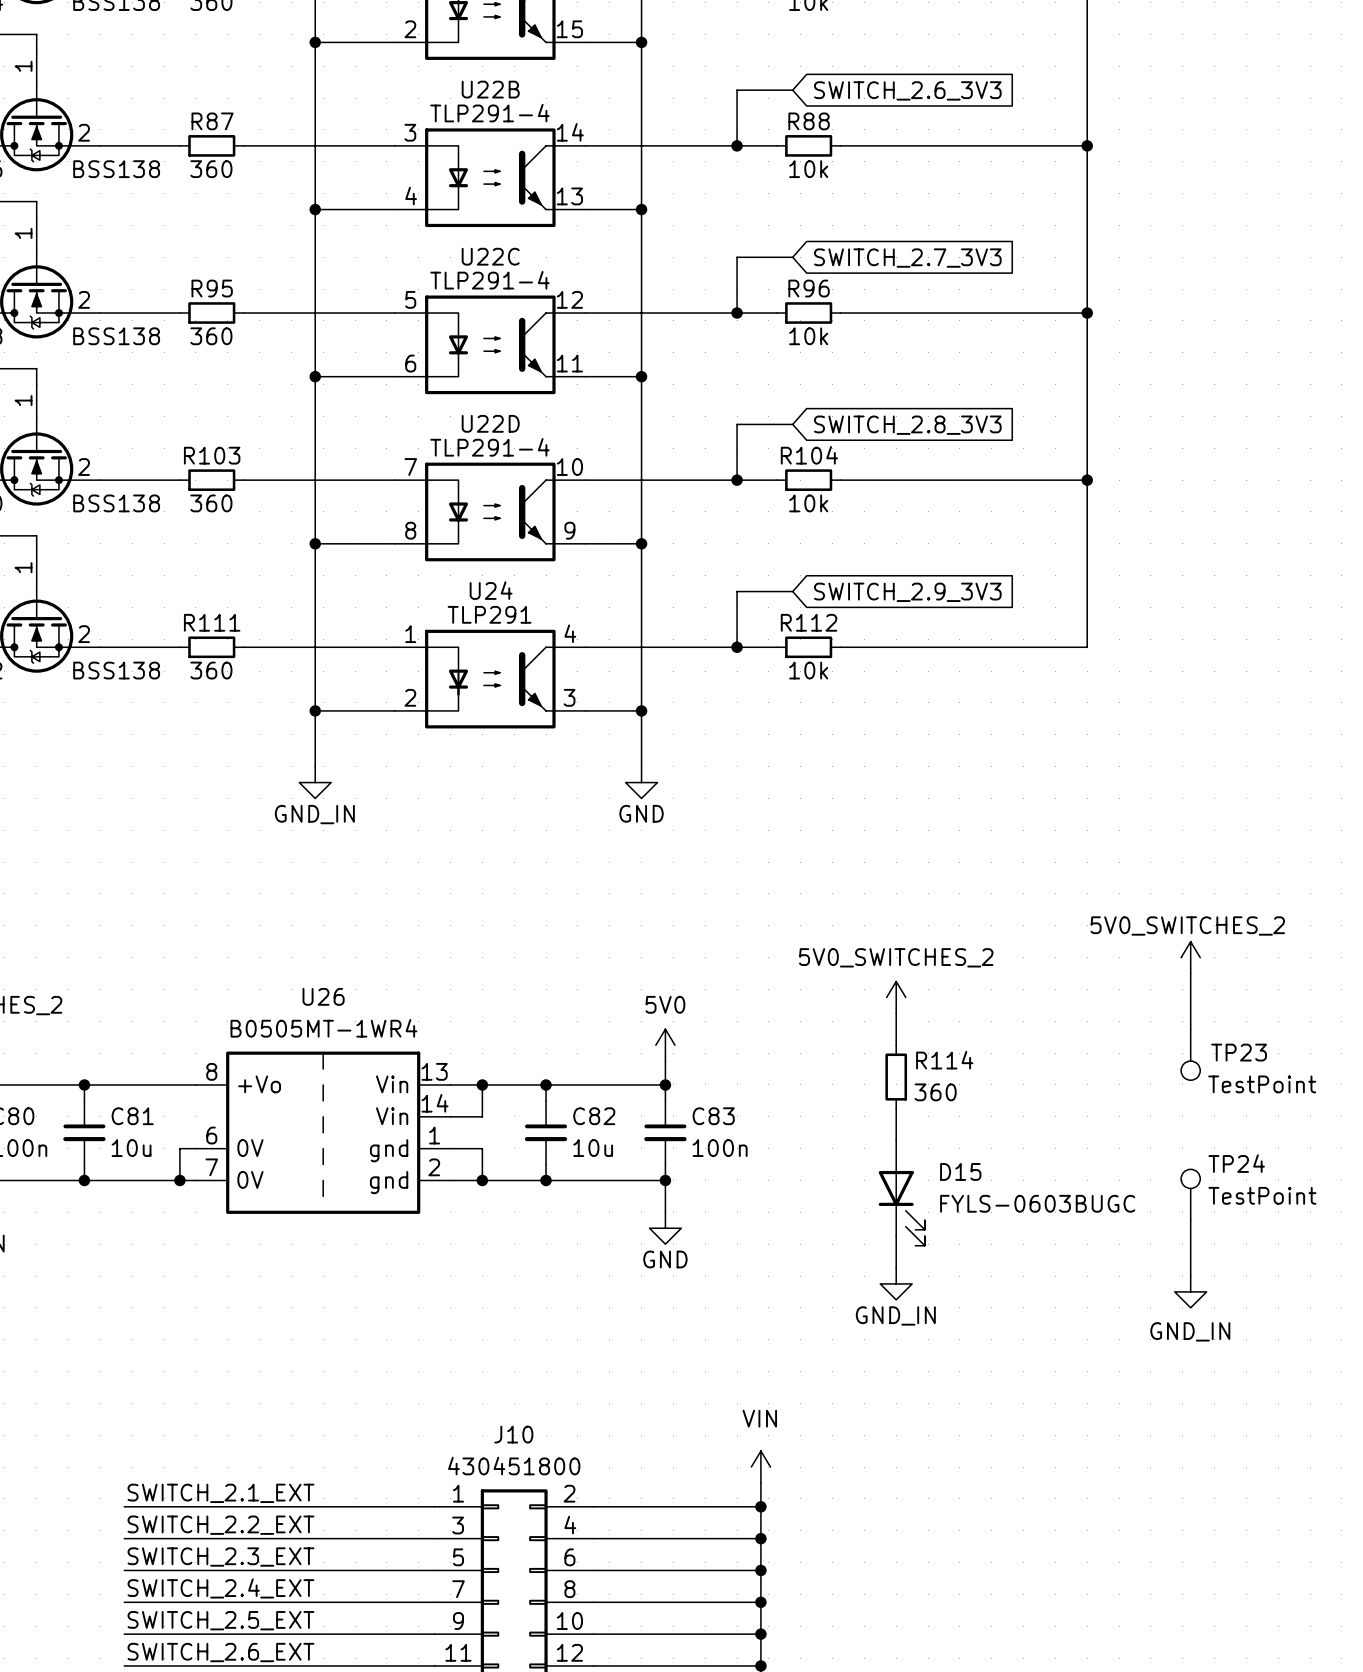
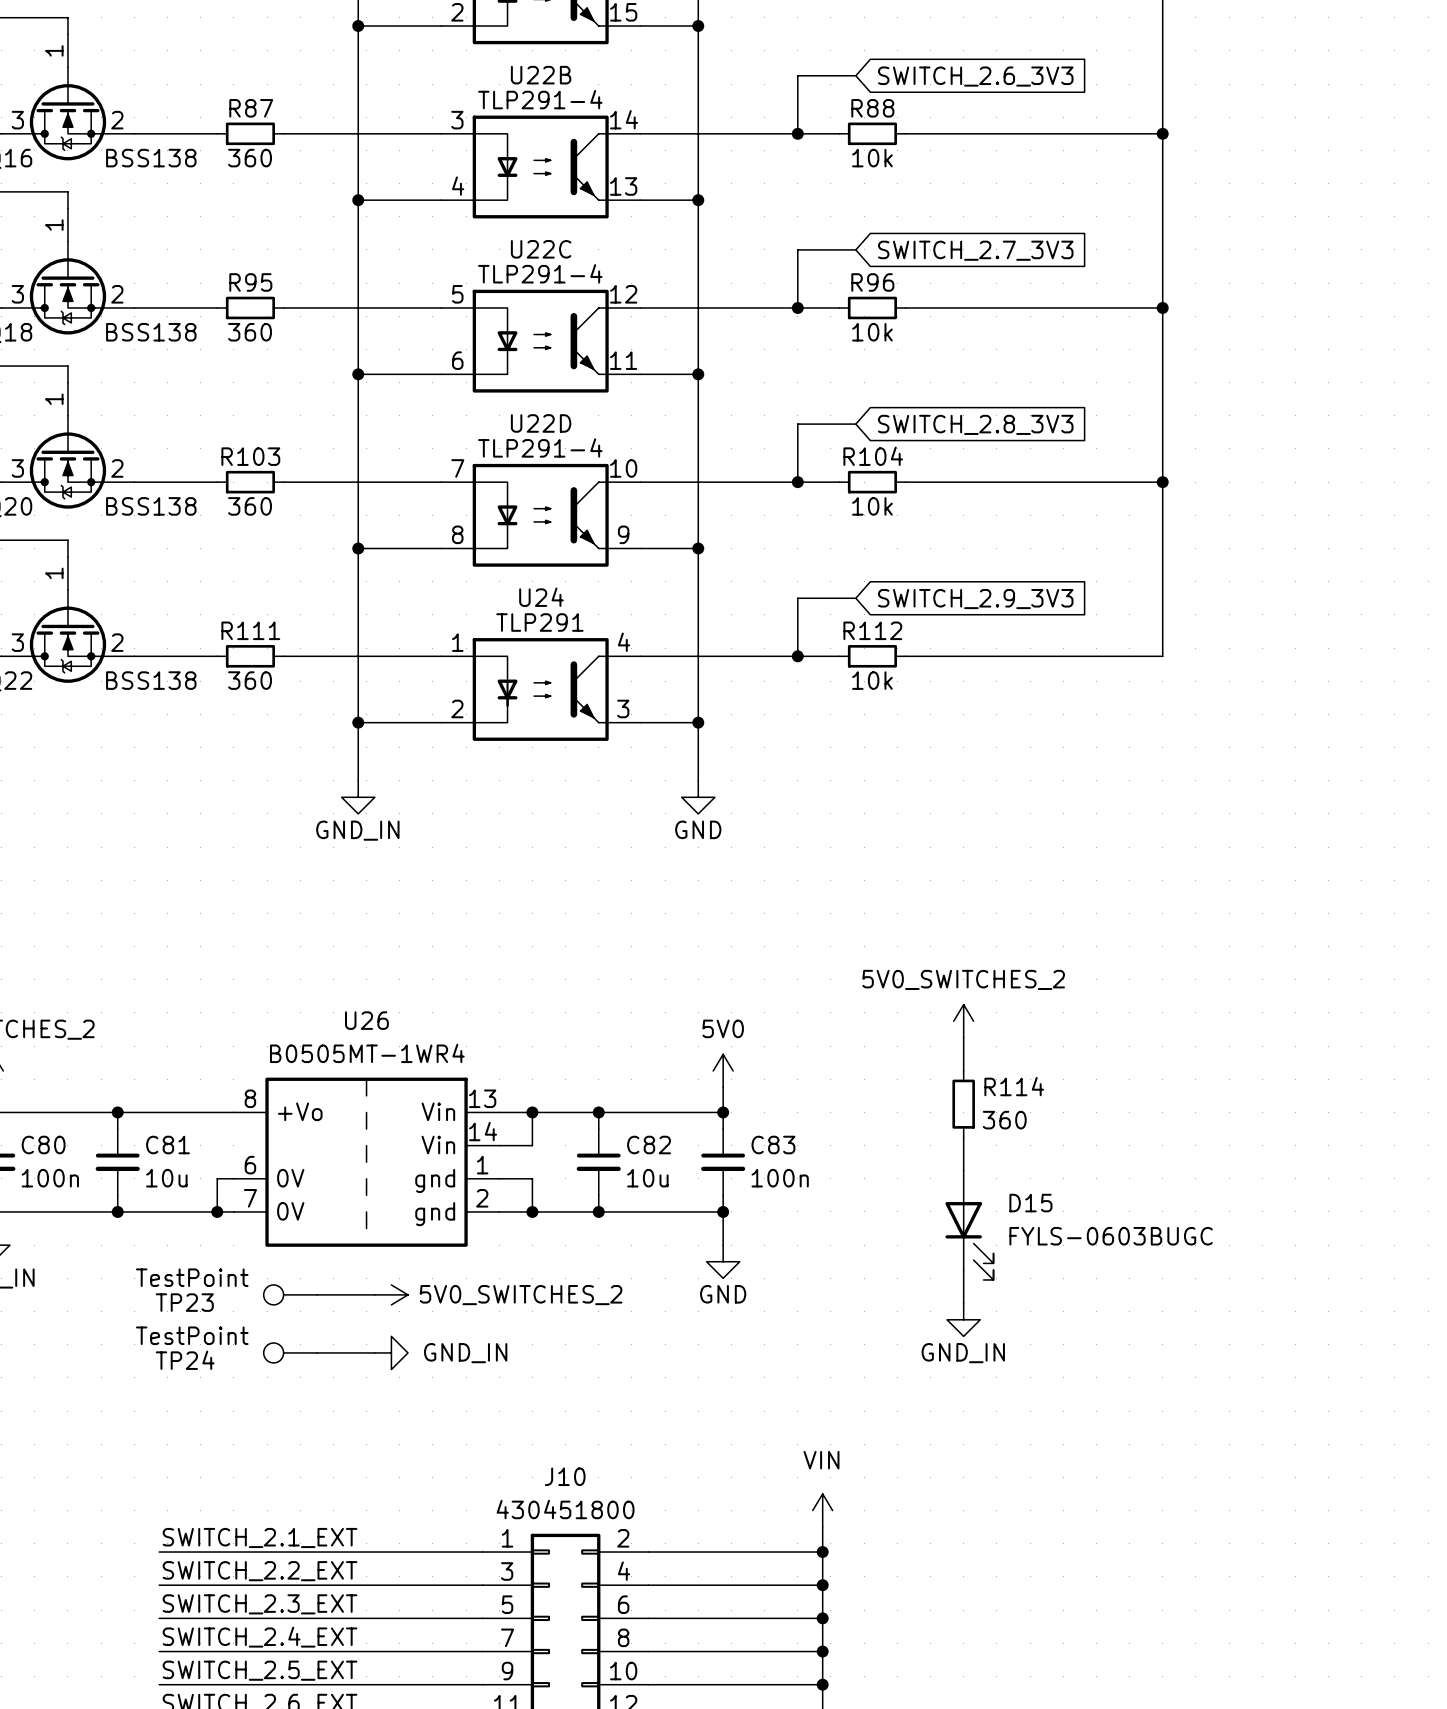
power symbol: 5V0_SWITCHES_2 (1190, 957) -> none
wire: (1190, 973) (1190, 1029) -> none
TP23 name position: TP23 (1239, 1052) -> TP23 (184, 1302)
TP23 position: (1190, 1054) -> (290, 1294)
TP23 rotation: 0° (1190, 1070) -> 90° clockwise (273, 1294)
TP23 value position: TestPoint (1262, 1084) -> TestPoint (192, 1277)
TP24 name position: TP24 (1236, 1163) -> TP24 (185, 1360)
TP24 rotation: 0° (1190, 1178) -> 90° counterclockwise (273, 1352)
TP24 position: (1190, 1194) -> (290, 1352)
TP24 value position: TestPoint (1262, 1195) -> TestPoint (192, 1335)
wire: (1190, 1220) (1190, 1276) -> none
wire: none -> (316, 1294) (374, 1294)
power symbol: none -> 5V0_SWITCHES_2 (391, 1294)
power symbol: GND_IN (1190, 1291) -> none
wire: none -> (316, 1352) (374, 1352)
power symbol: none -> GND_IN (391, 1352)

